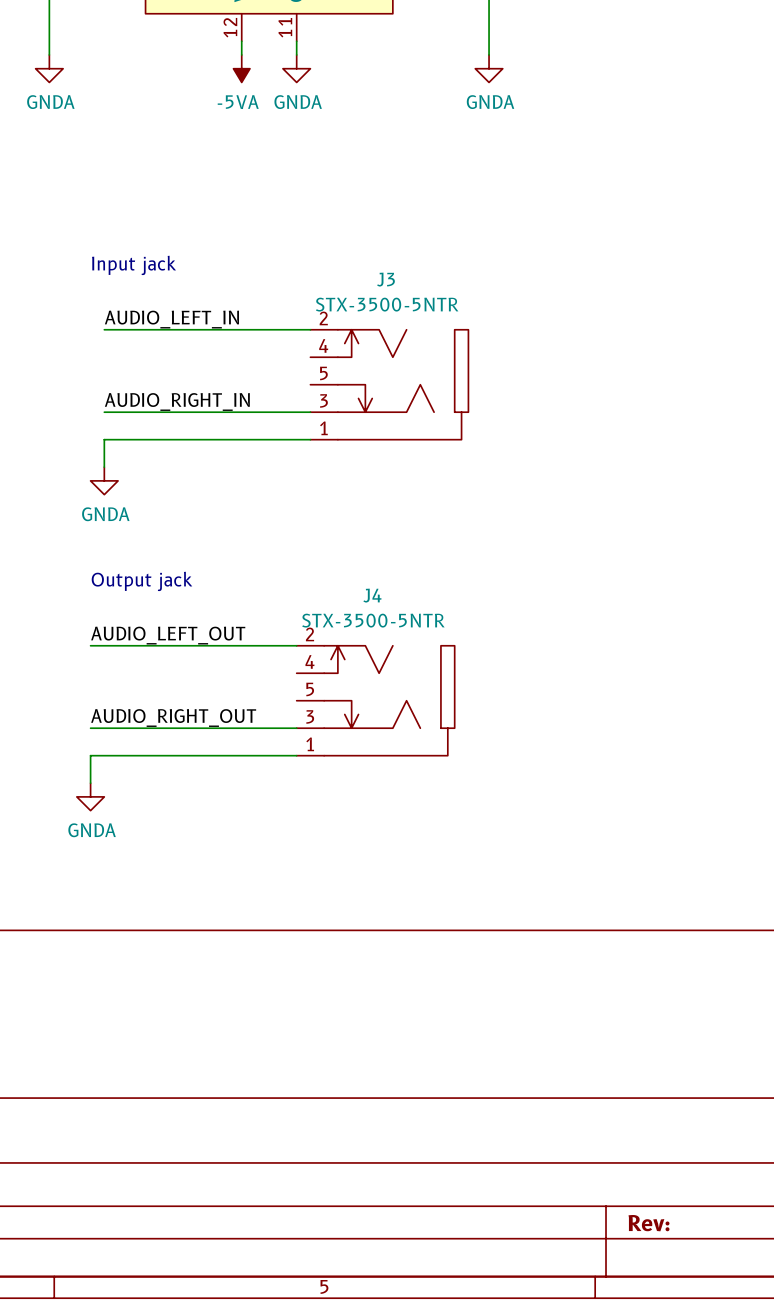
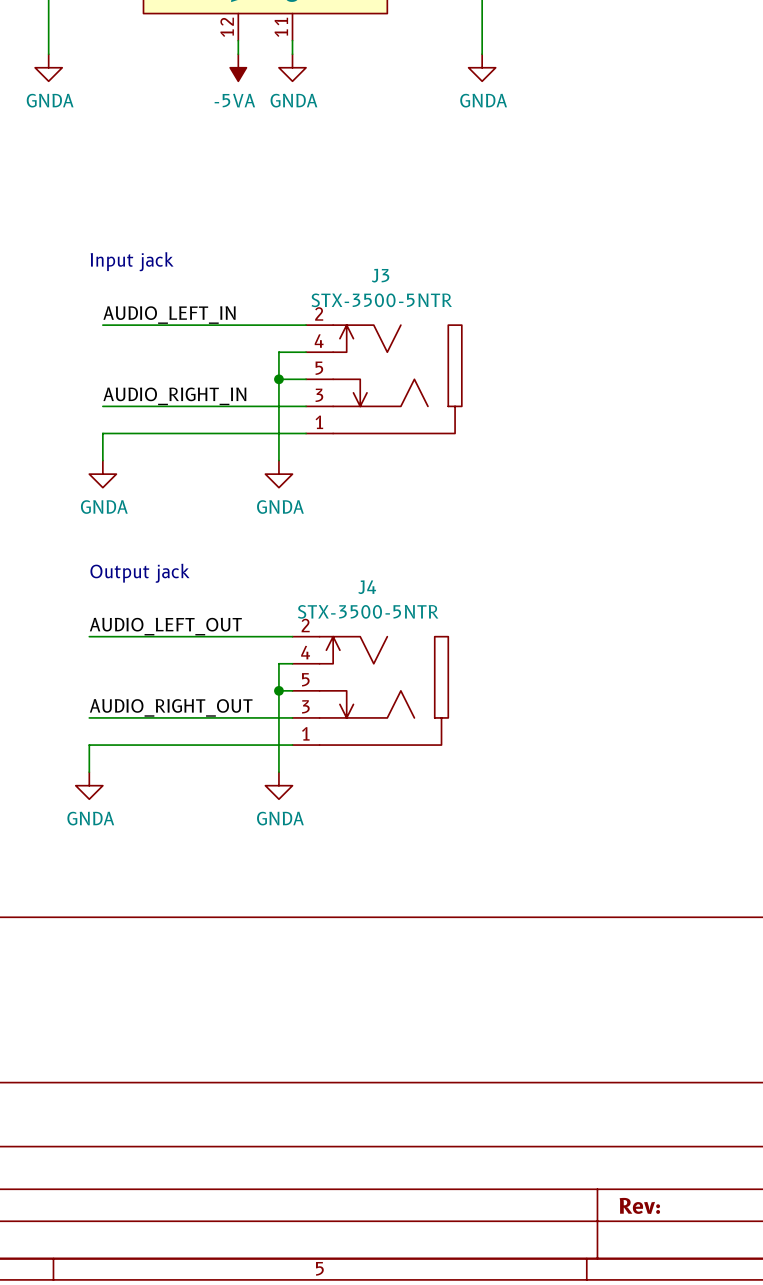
wire: none -> (306, 352) (278, 352) (278, 460)
wire: none -> (278, 379) (306, 379)
junction: none -> (278, 379)
power symbol: none -> GNDA (278, 474)
wire: none -> (292, 663) (278, 663) (278, 772)
wire: none -> (278, 690) (292, 690)
junction: none -> (278, 690)
power symbol: none -> GNDA (278, 785)

